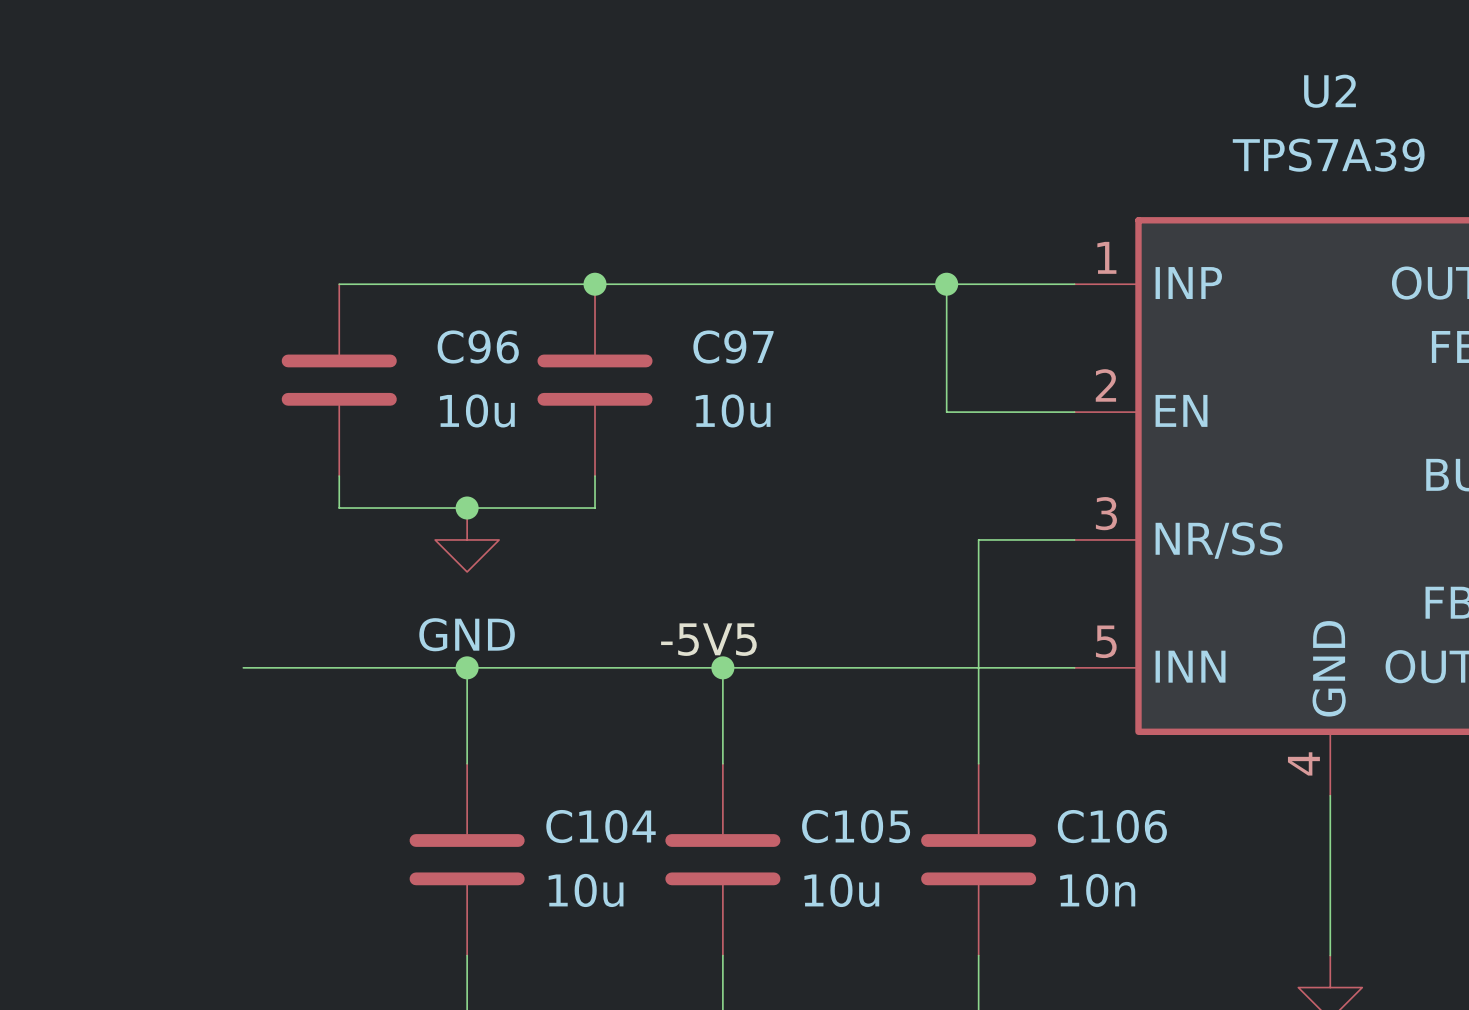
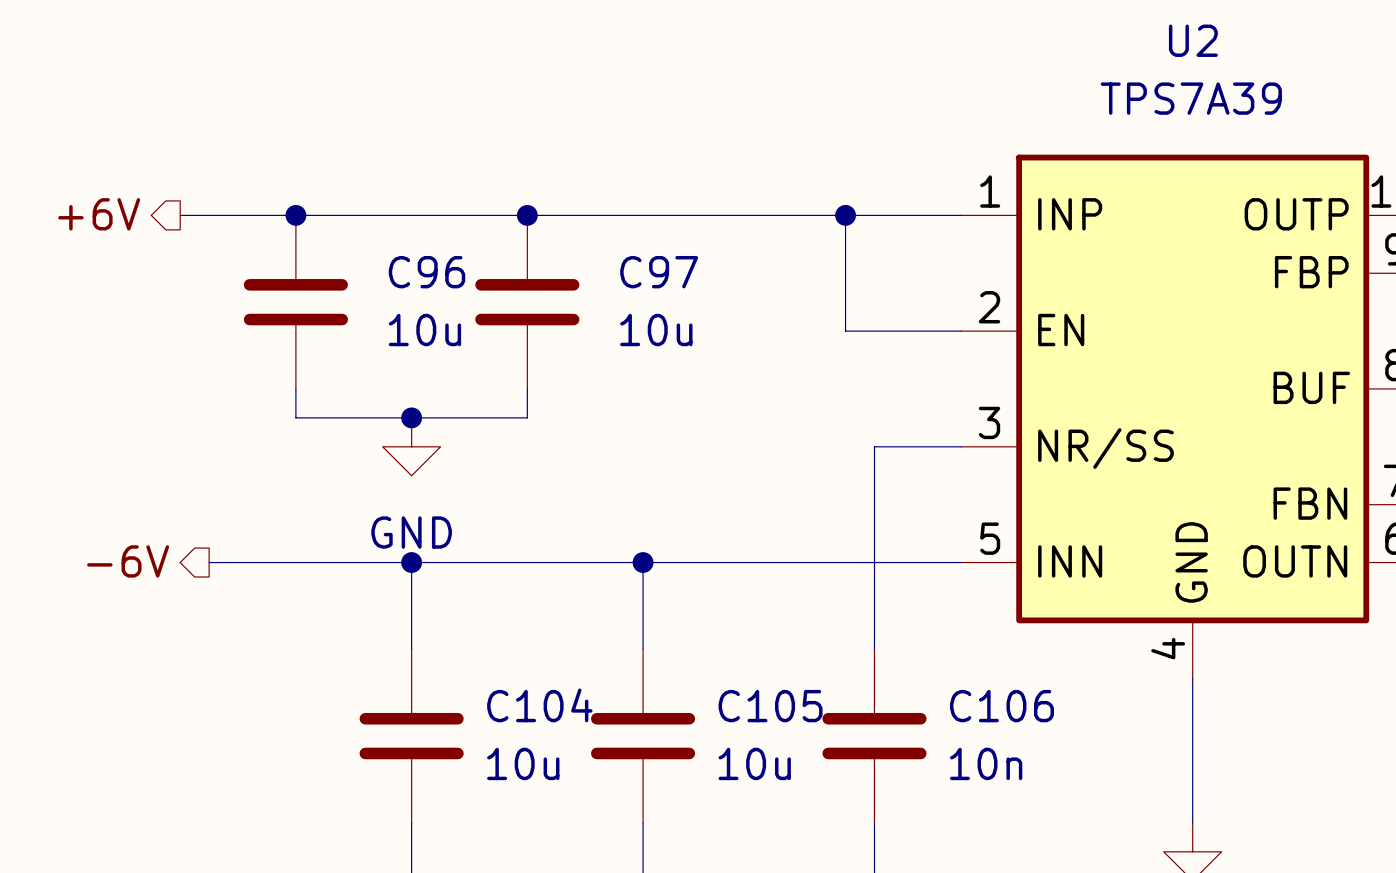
hierarchical label: none -> +6V (99, 214)
wire: none -> (180, 215) (295, 215)
junction: none -> (295, 215)
label: -5V5 (708, 639) -> none
hierarchical label: none -> -6V (128, 561)

